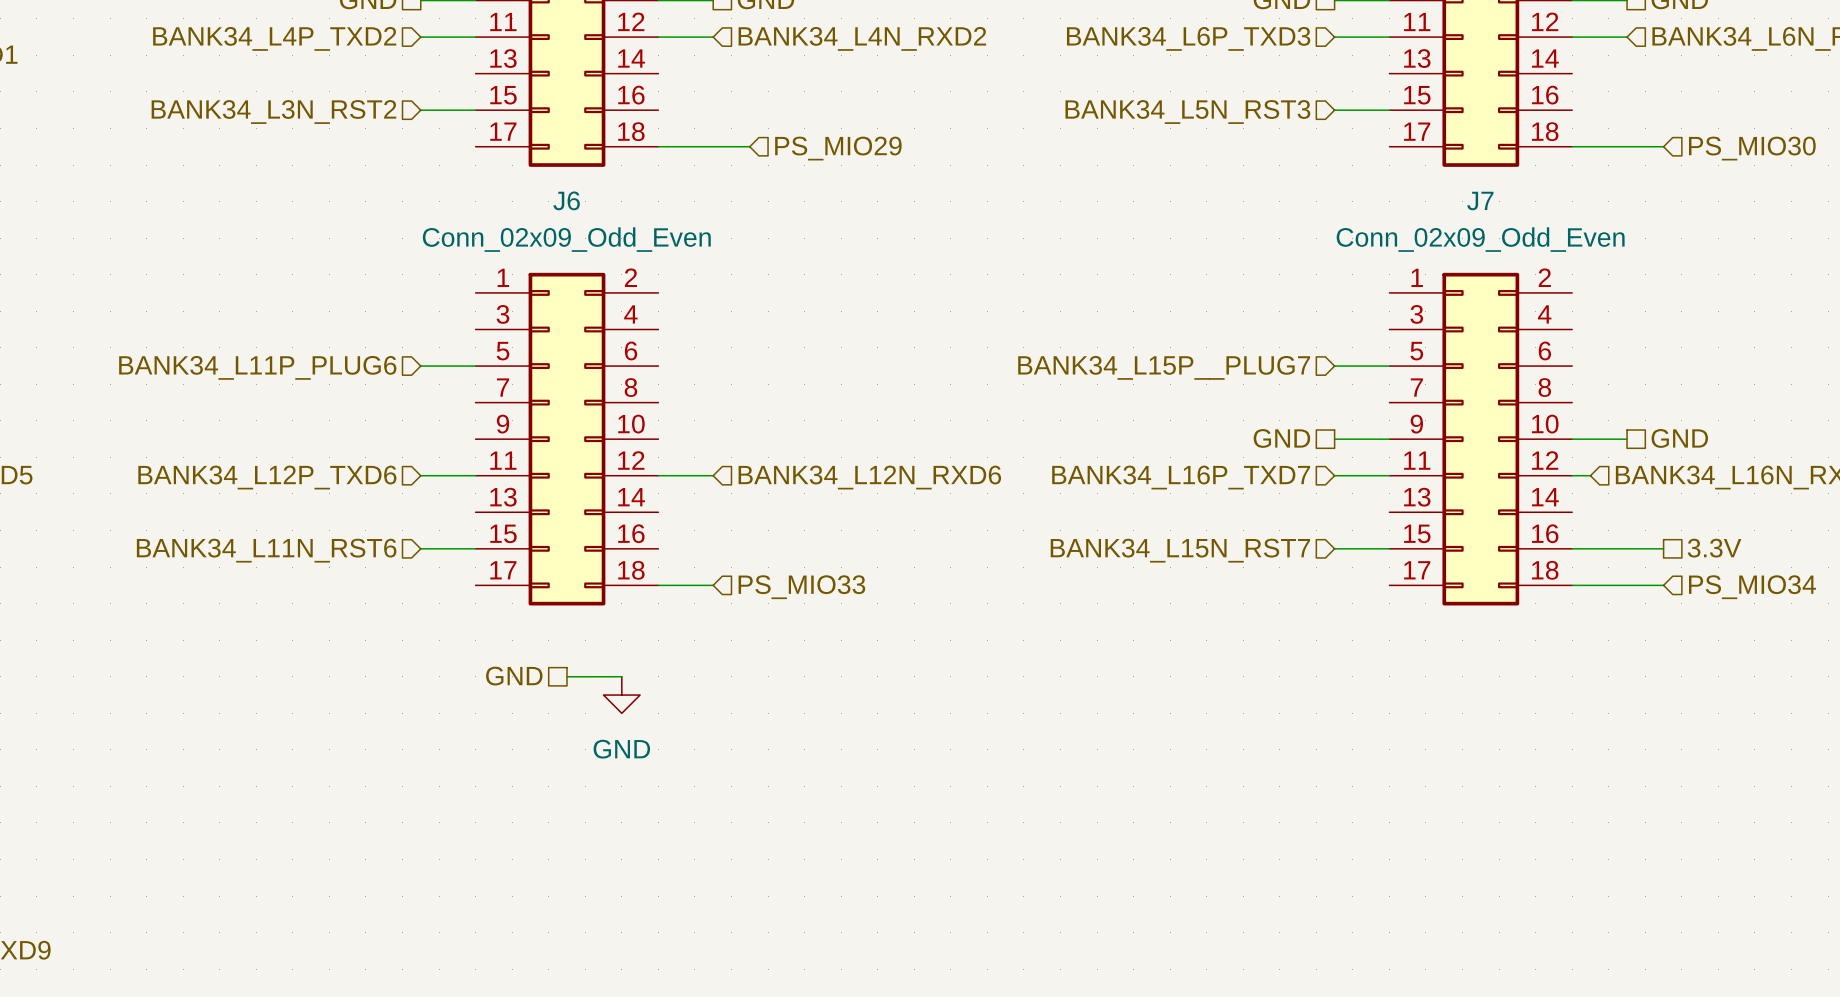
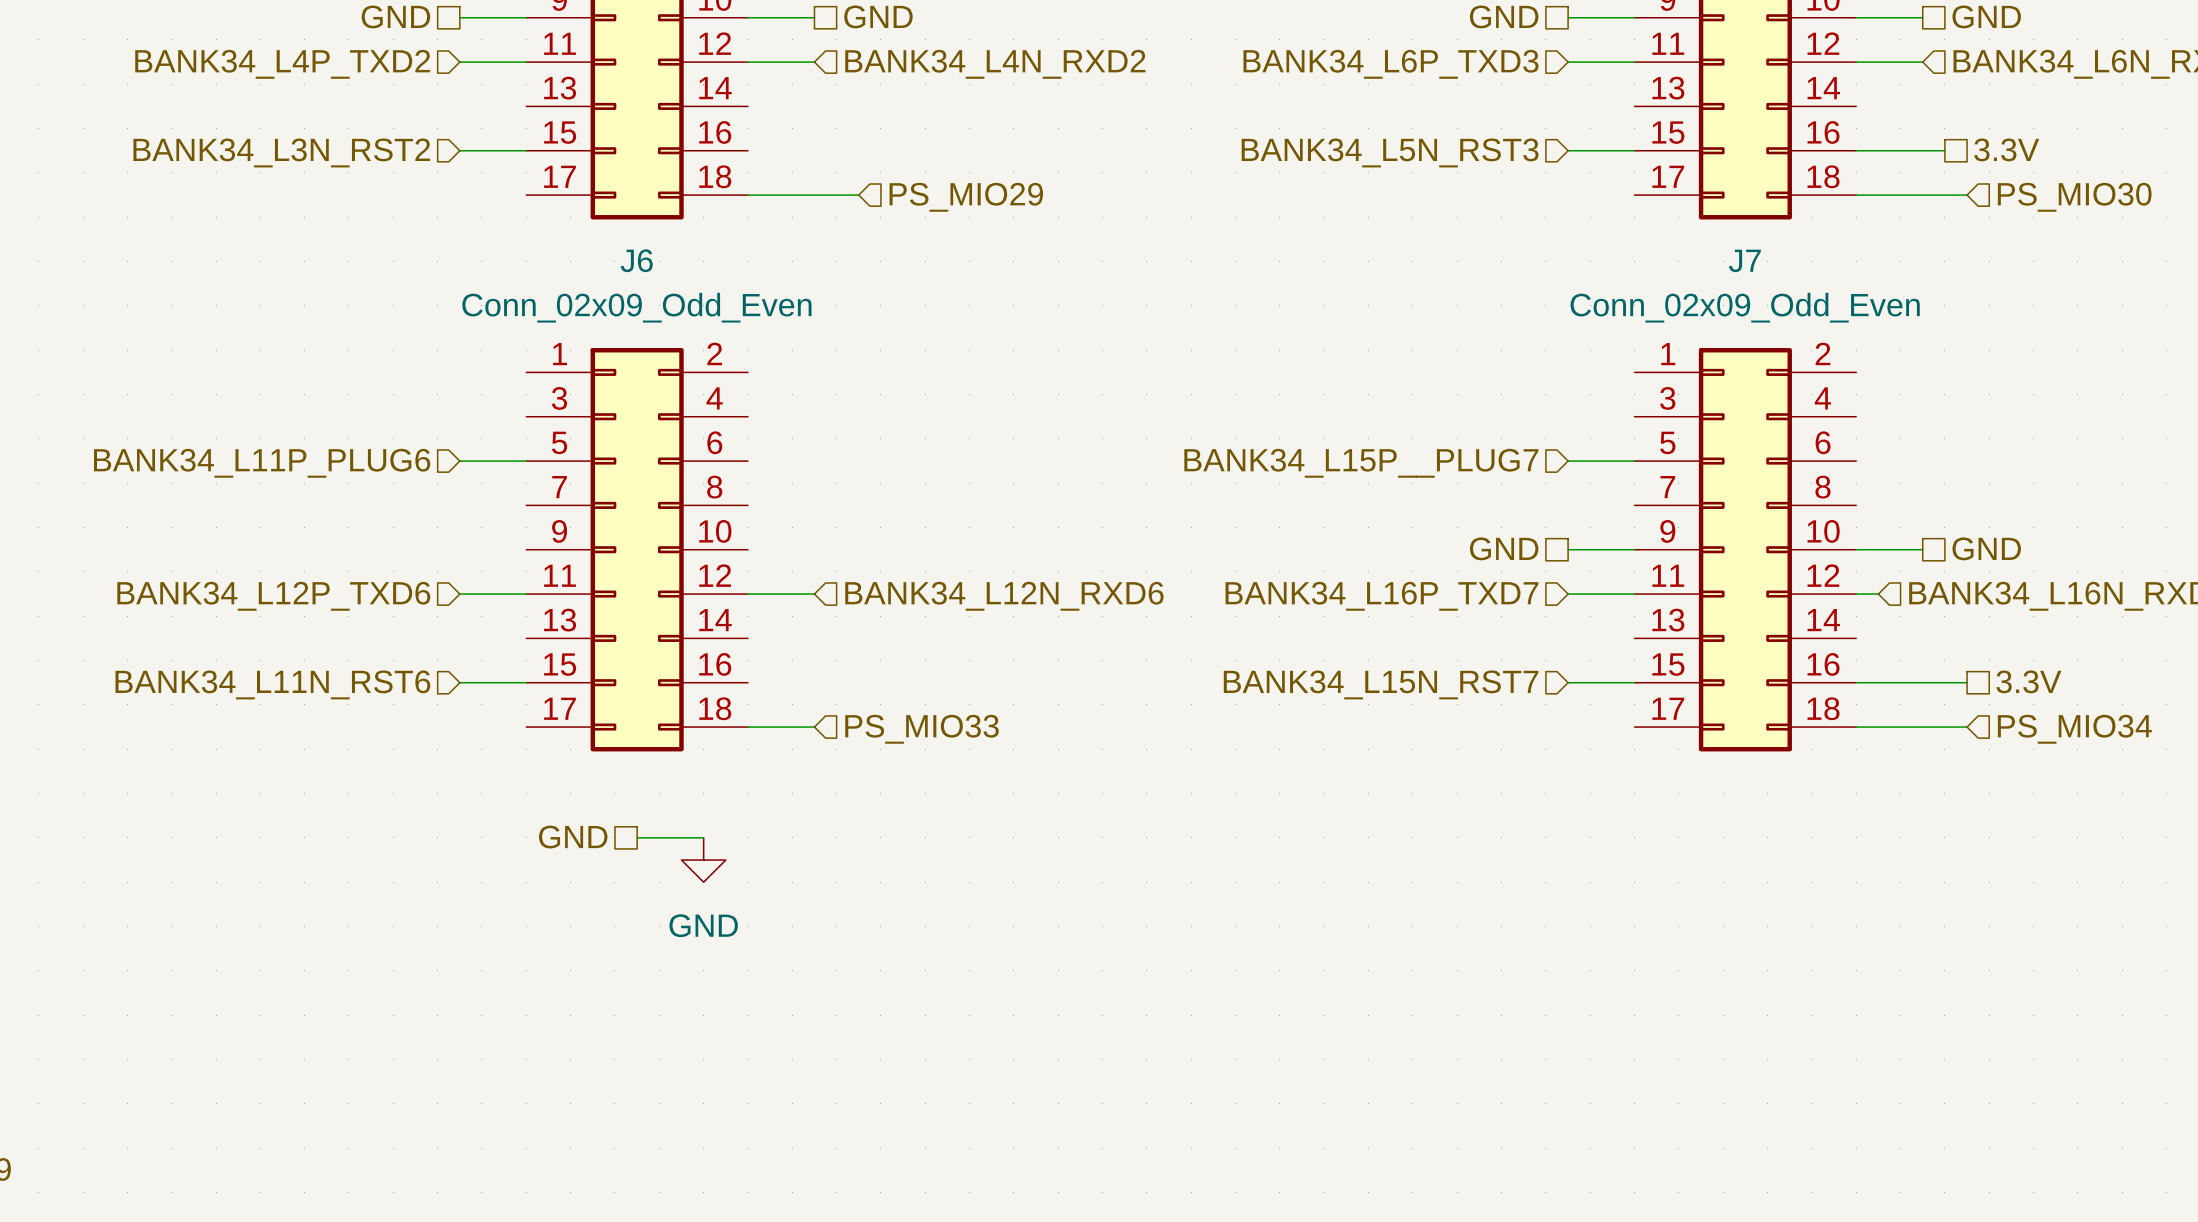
hierarchical label: none -> 3.3V (2006, 149)
wire: none -> (1856, 150) (1944, 150)

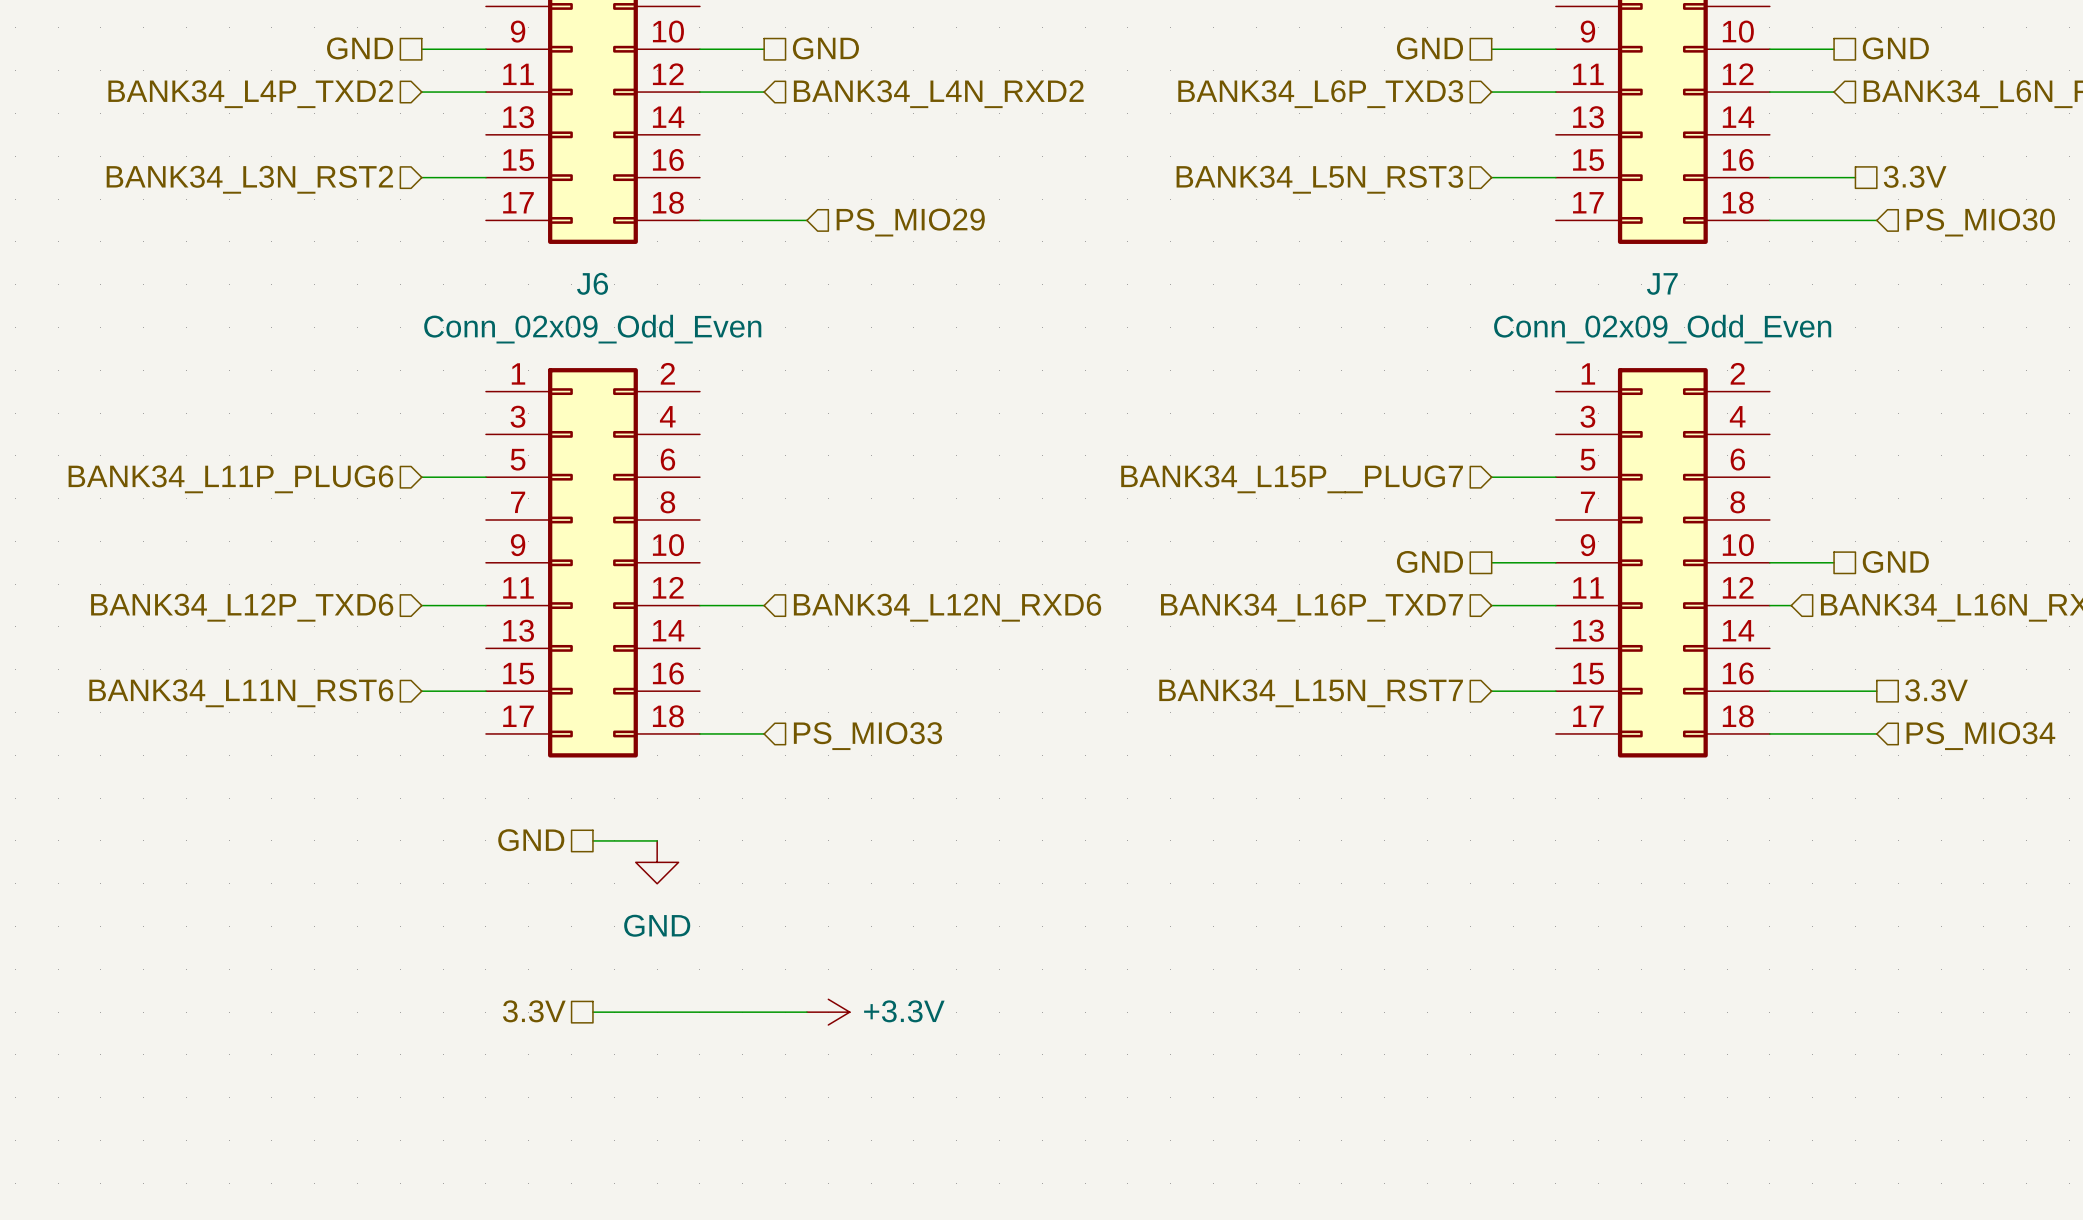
hierarchical label: none -> 3.3V (534, 1011)
wire: none -> (592, 1012) (806, 1012)
power symbol: none -> +3.3V (828, 1012)

